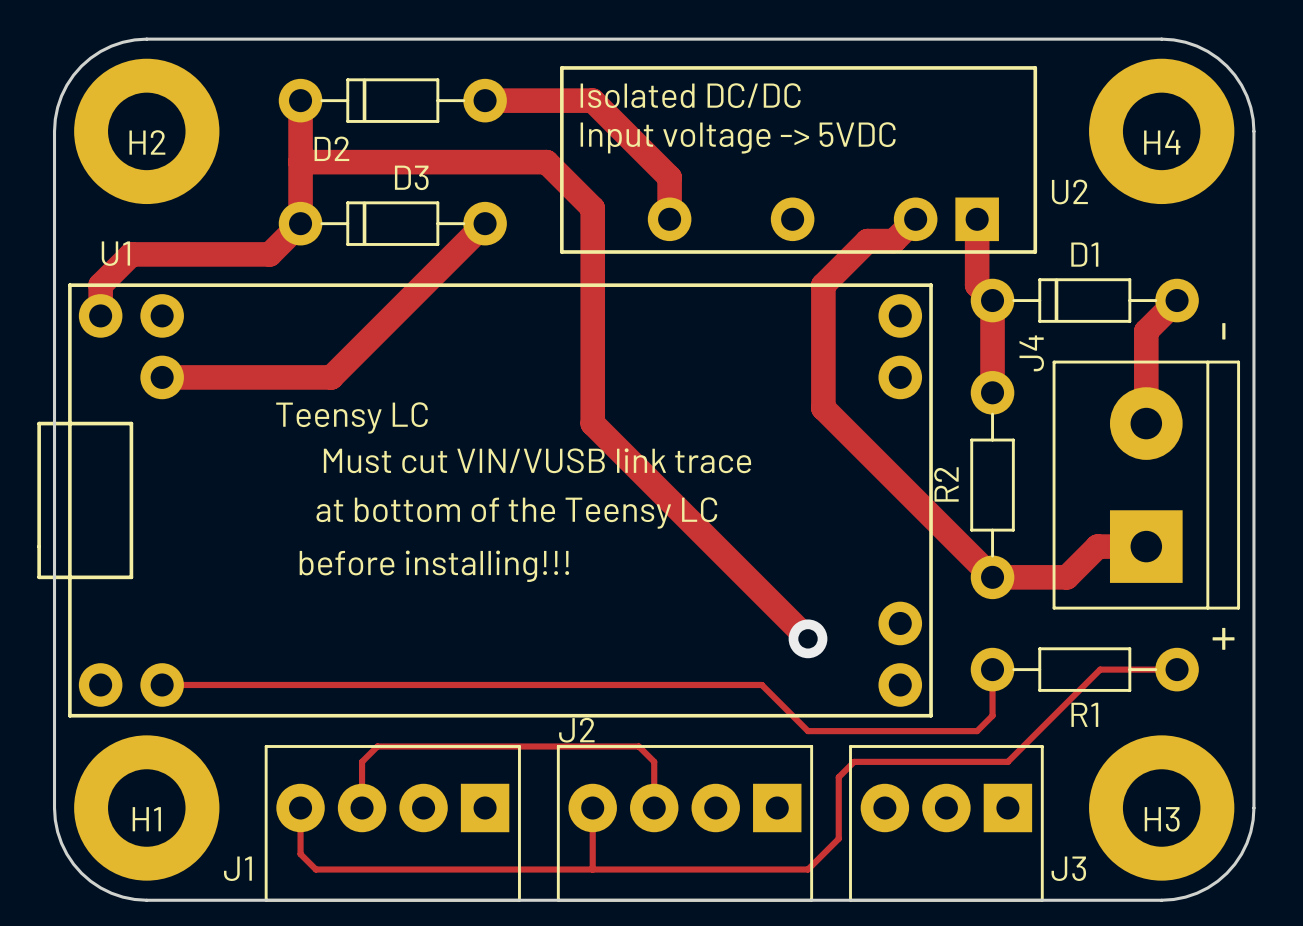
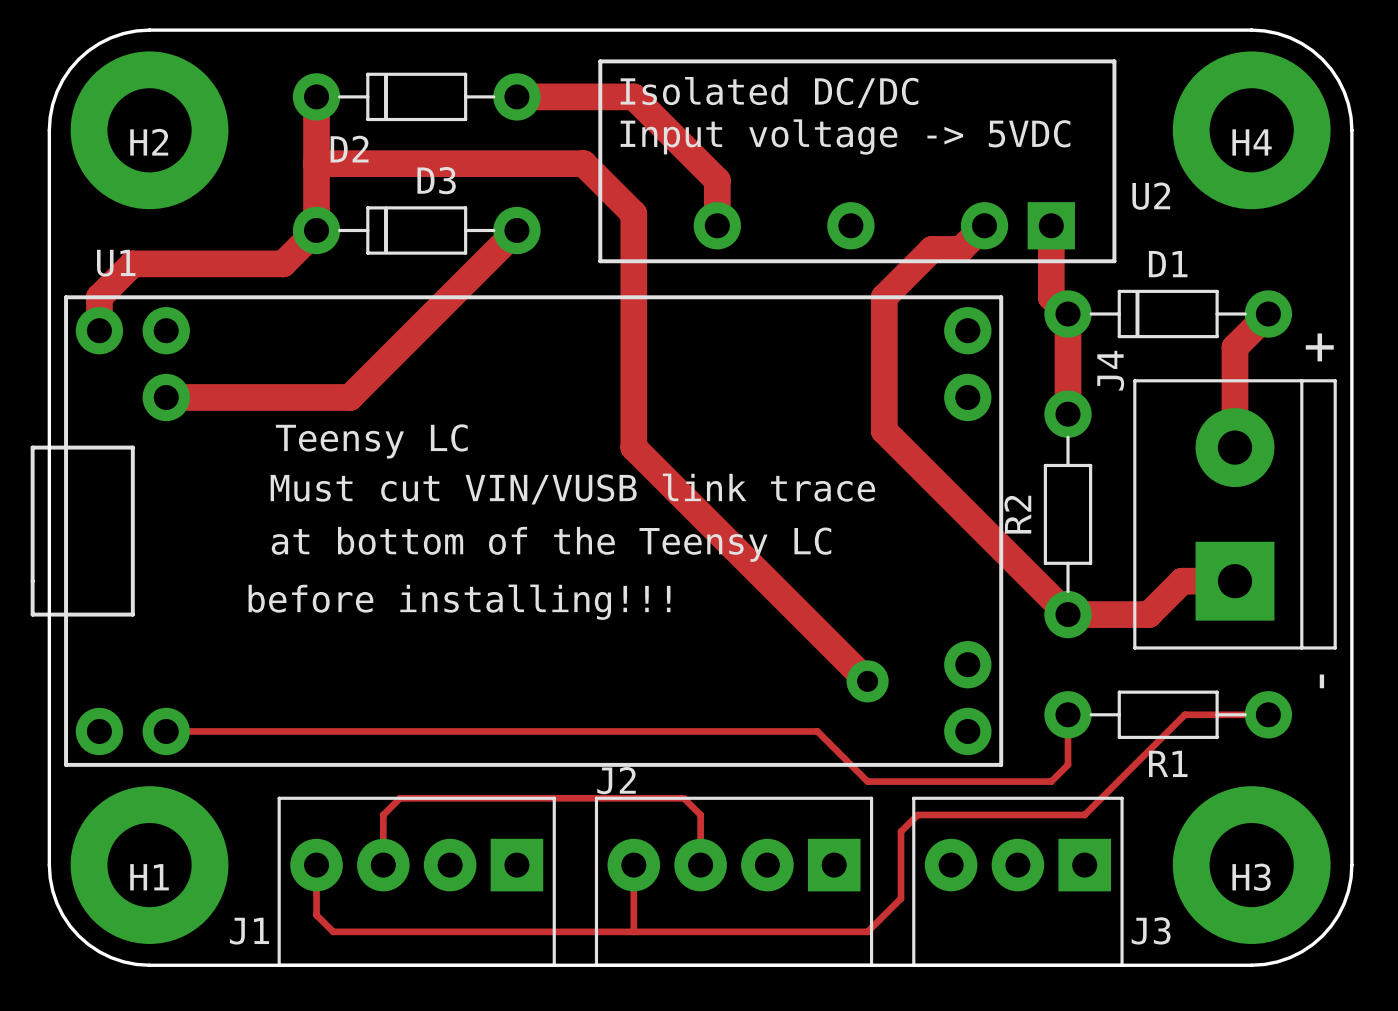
text: - (1223, 331) -> + (1319, 347)
text: + (1223, 638) -> - (1321, 681)

